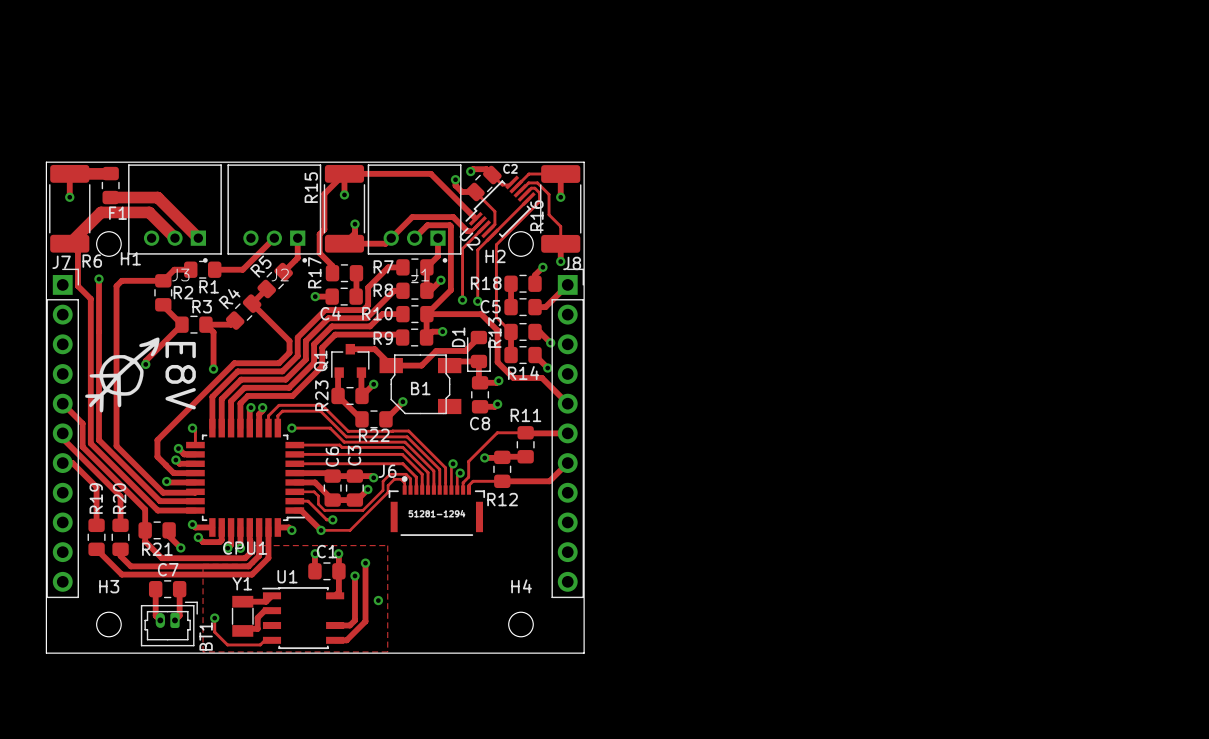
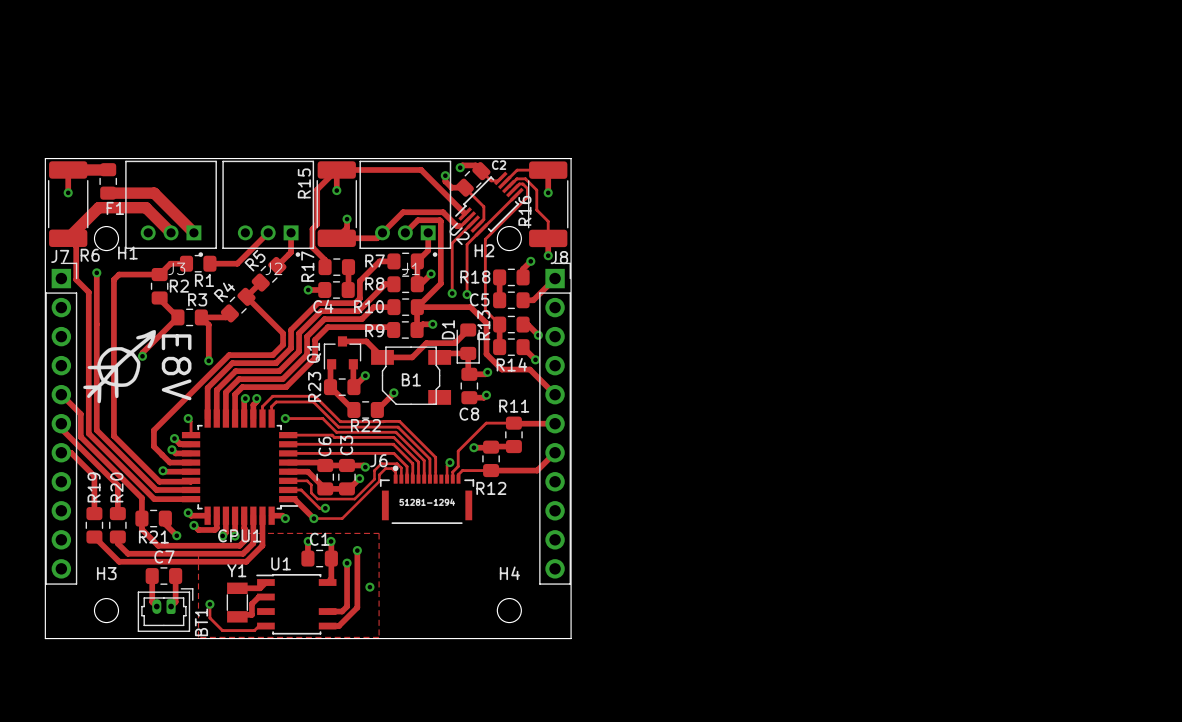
track: (453, 463) (451, 465) (451, 490) -> none
via: (453, 463) -> none

